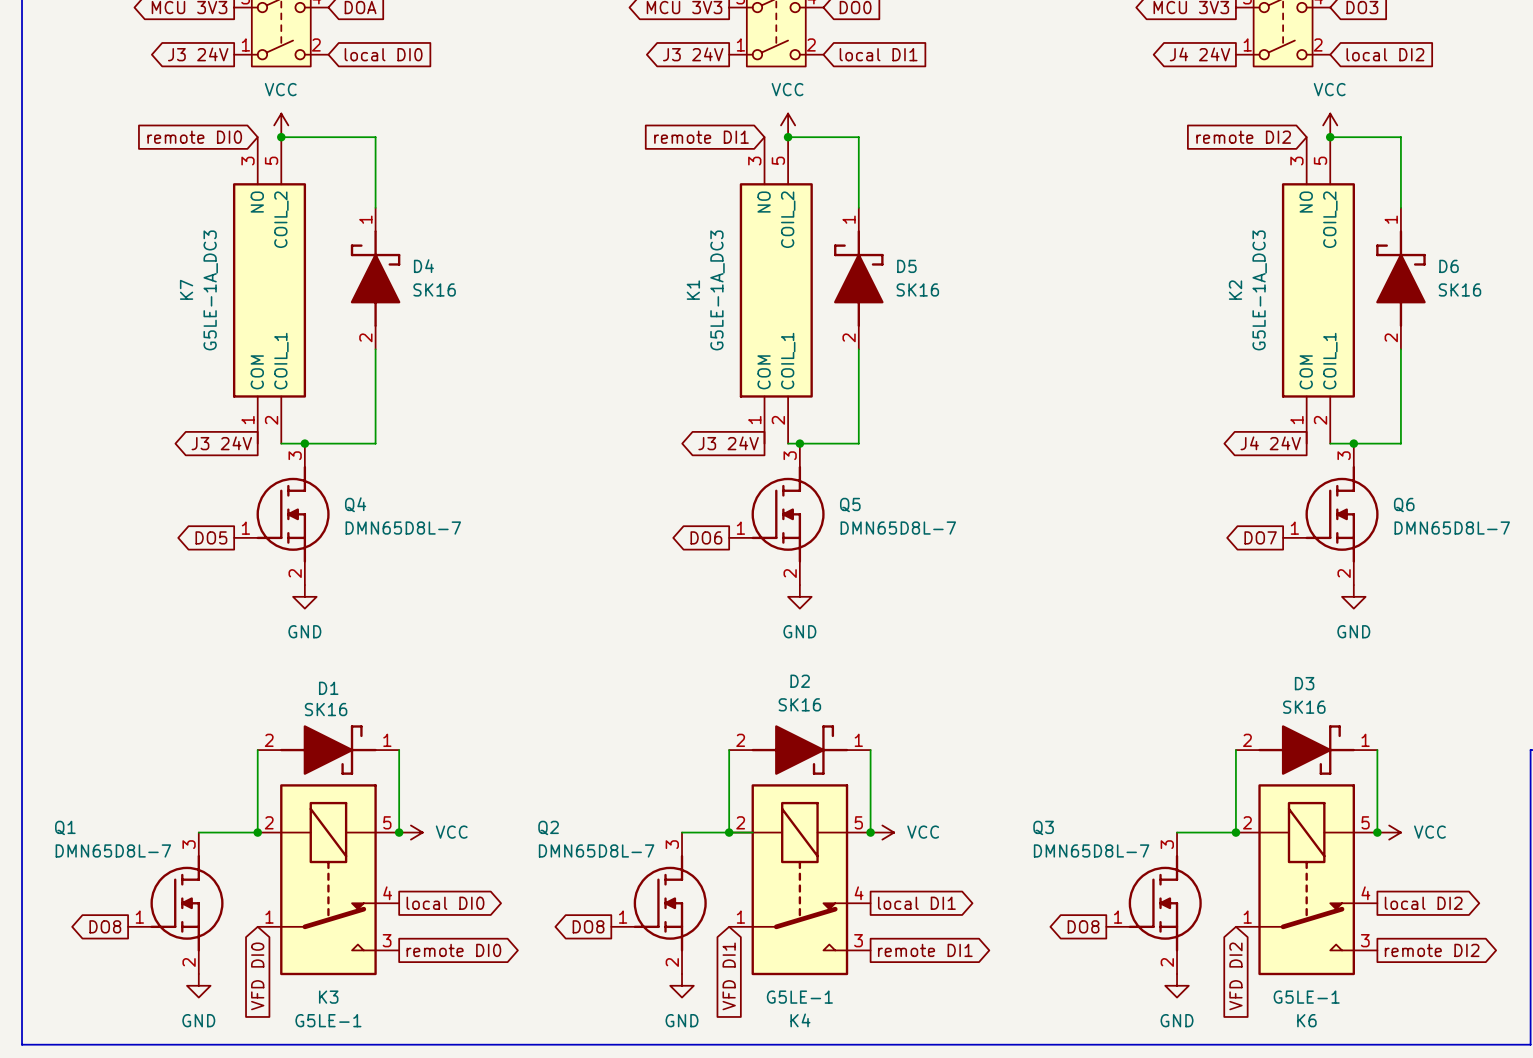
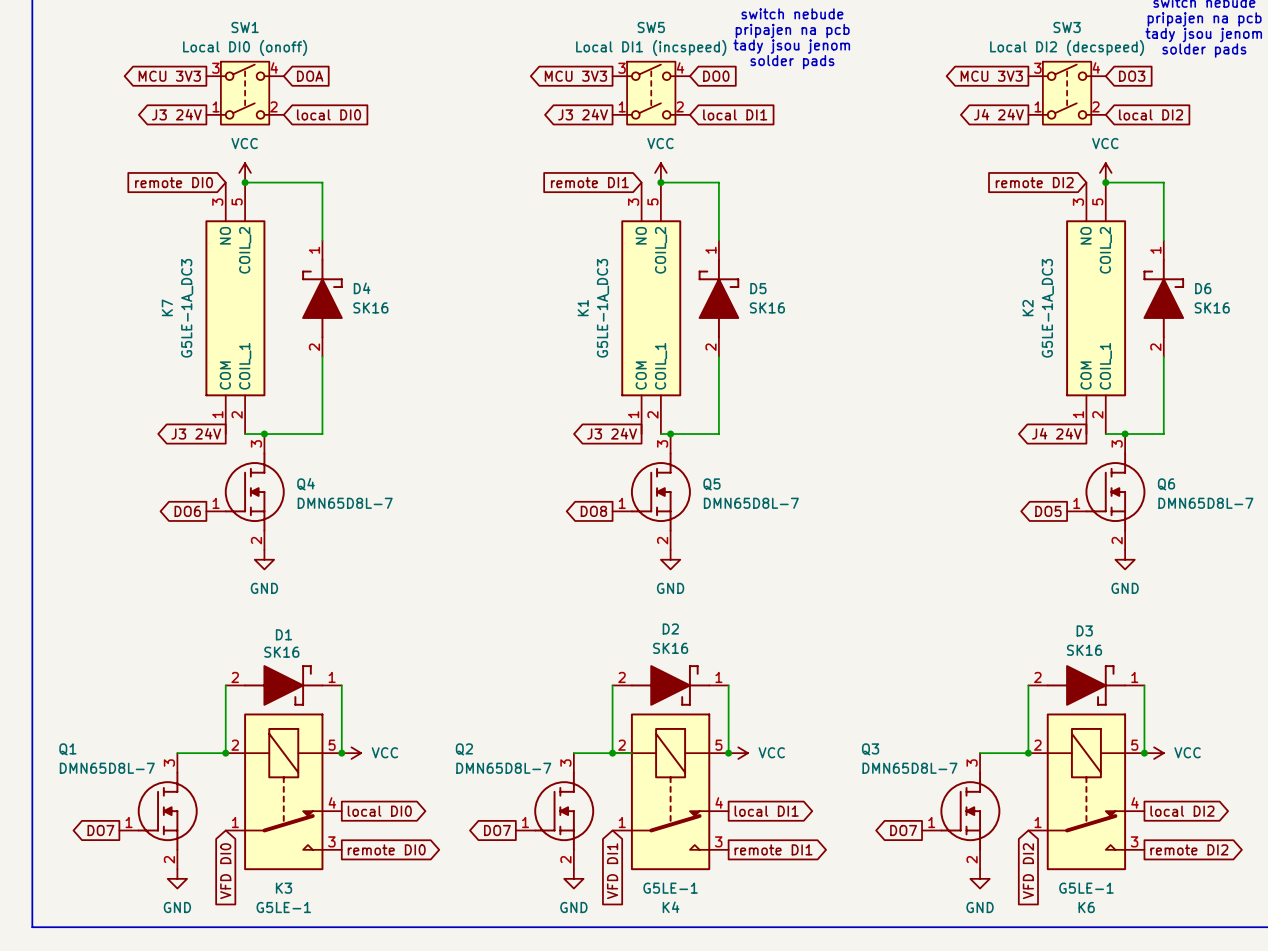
global label: DO5 (211, 537) -> DO6 (187, 511)
global label: DO6 (706, 537) -> DO8 (593, 511)
global label: DO7 (1260, 537) -> DO5 (1048, 511)
global label: DO8 (105, 926) -> DO7 (100, 830)
global label: DO8 (588, 926) -> DO7 (497, 830)
global label: DO8 (1083, 926) -> DO7 (903, 830)

